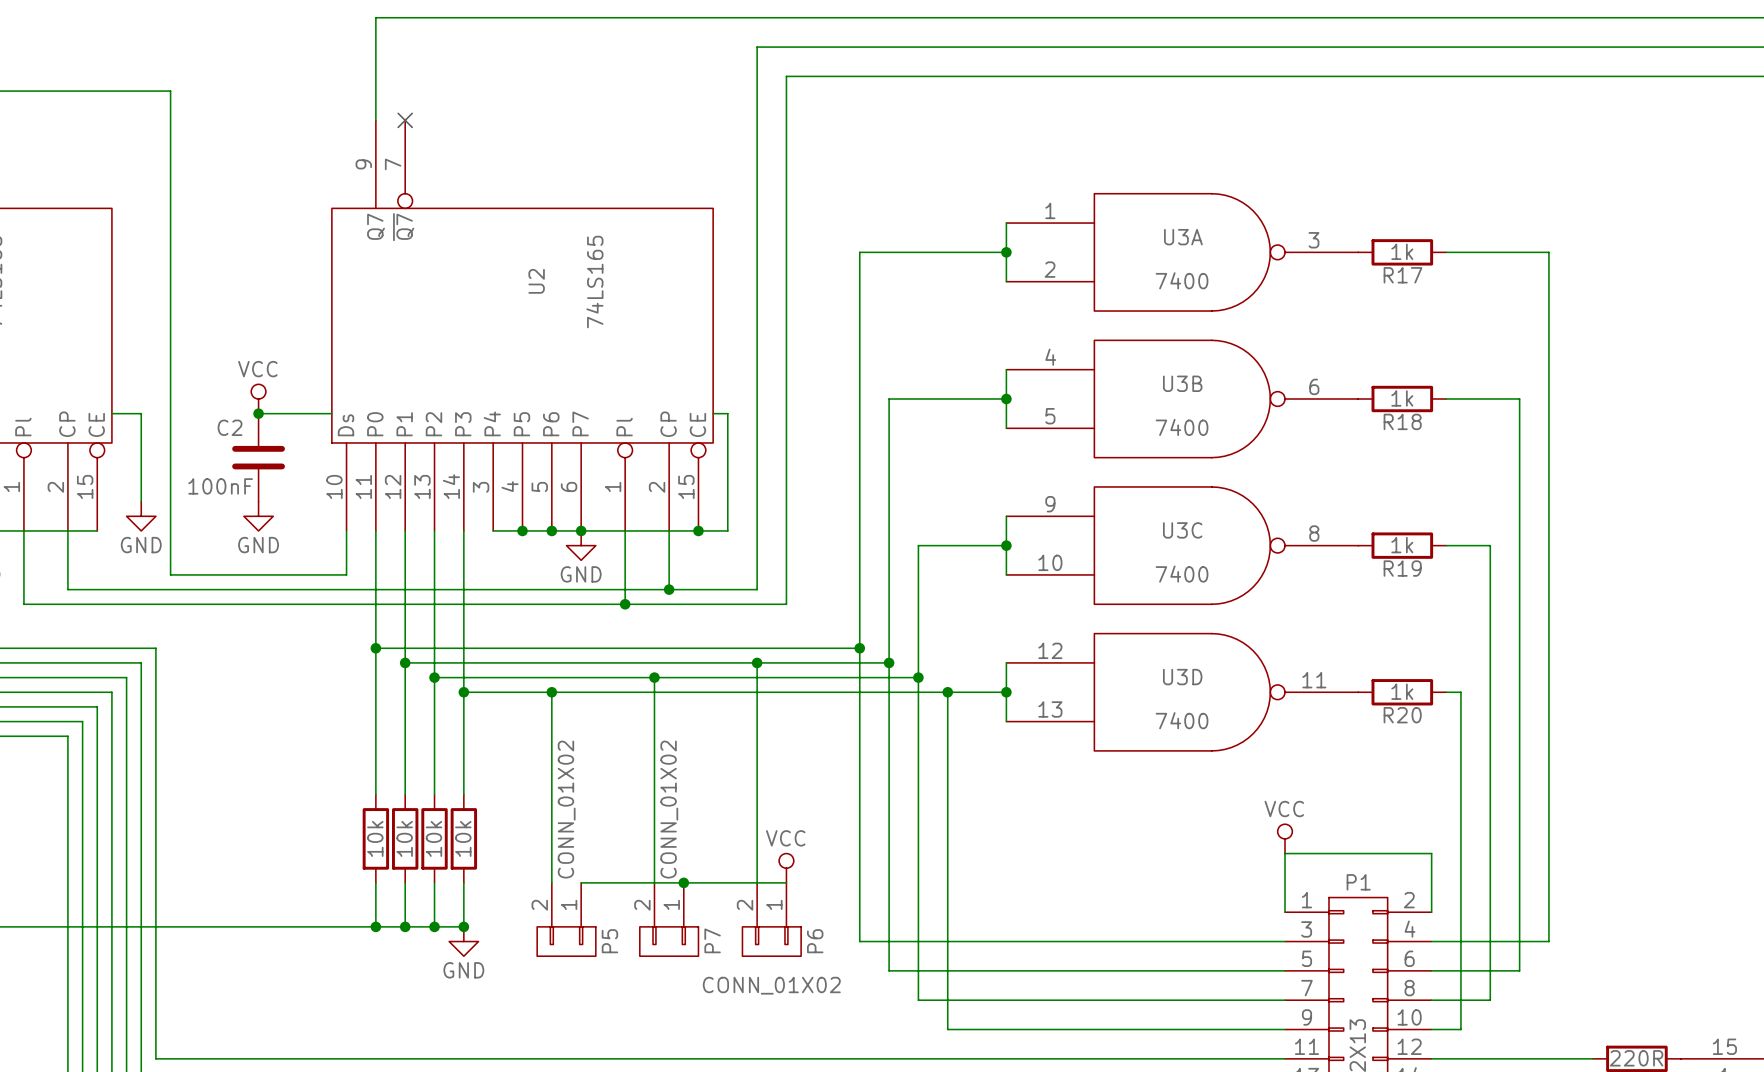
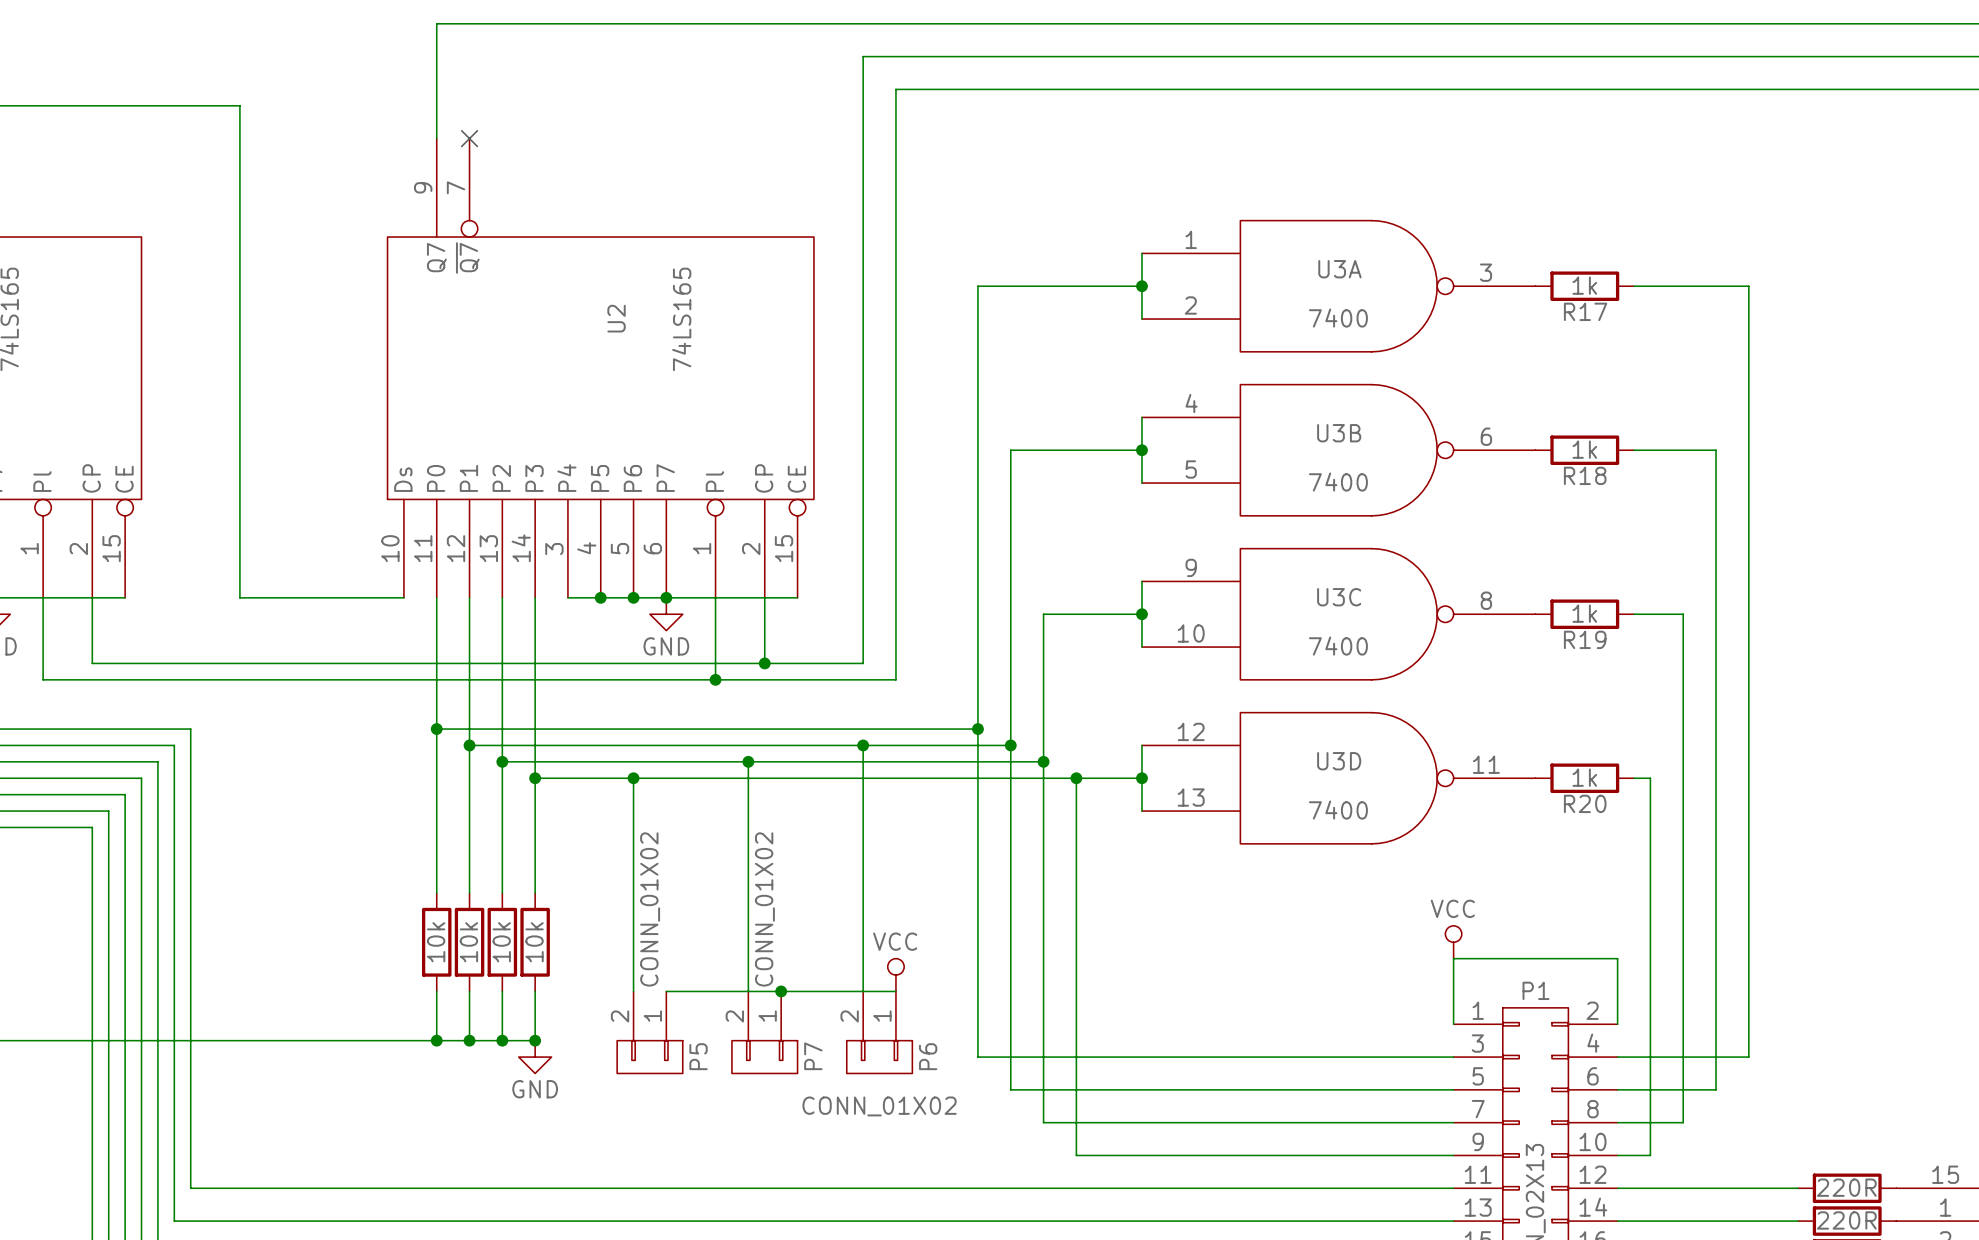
wire: (170, 91) (170, 574) (346, 574) (346, 530) -> (207, 105) (239, 105) (239, 597) (403, 597)
power symbol: VCC (258, 399) -> none
wire: (111, 413) (141, 413) (141, 501) -> none
wire: (258, 413) (331, 413) -> none
junction: (258, 413) -> none
wire: (713, 413) (727, 413) (727, 530) (698, 530) -> none
C2: 100nF (258, 457) -> none
power symbol: GND (141, 516) -> none
power symbol: GND (258, 516) -> none
junction: (698, 530) -> none

